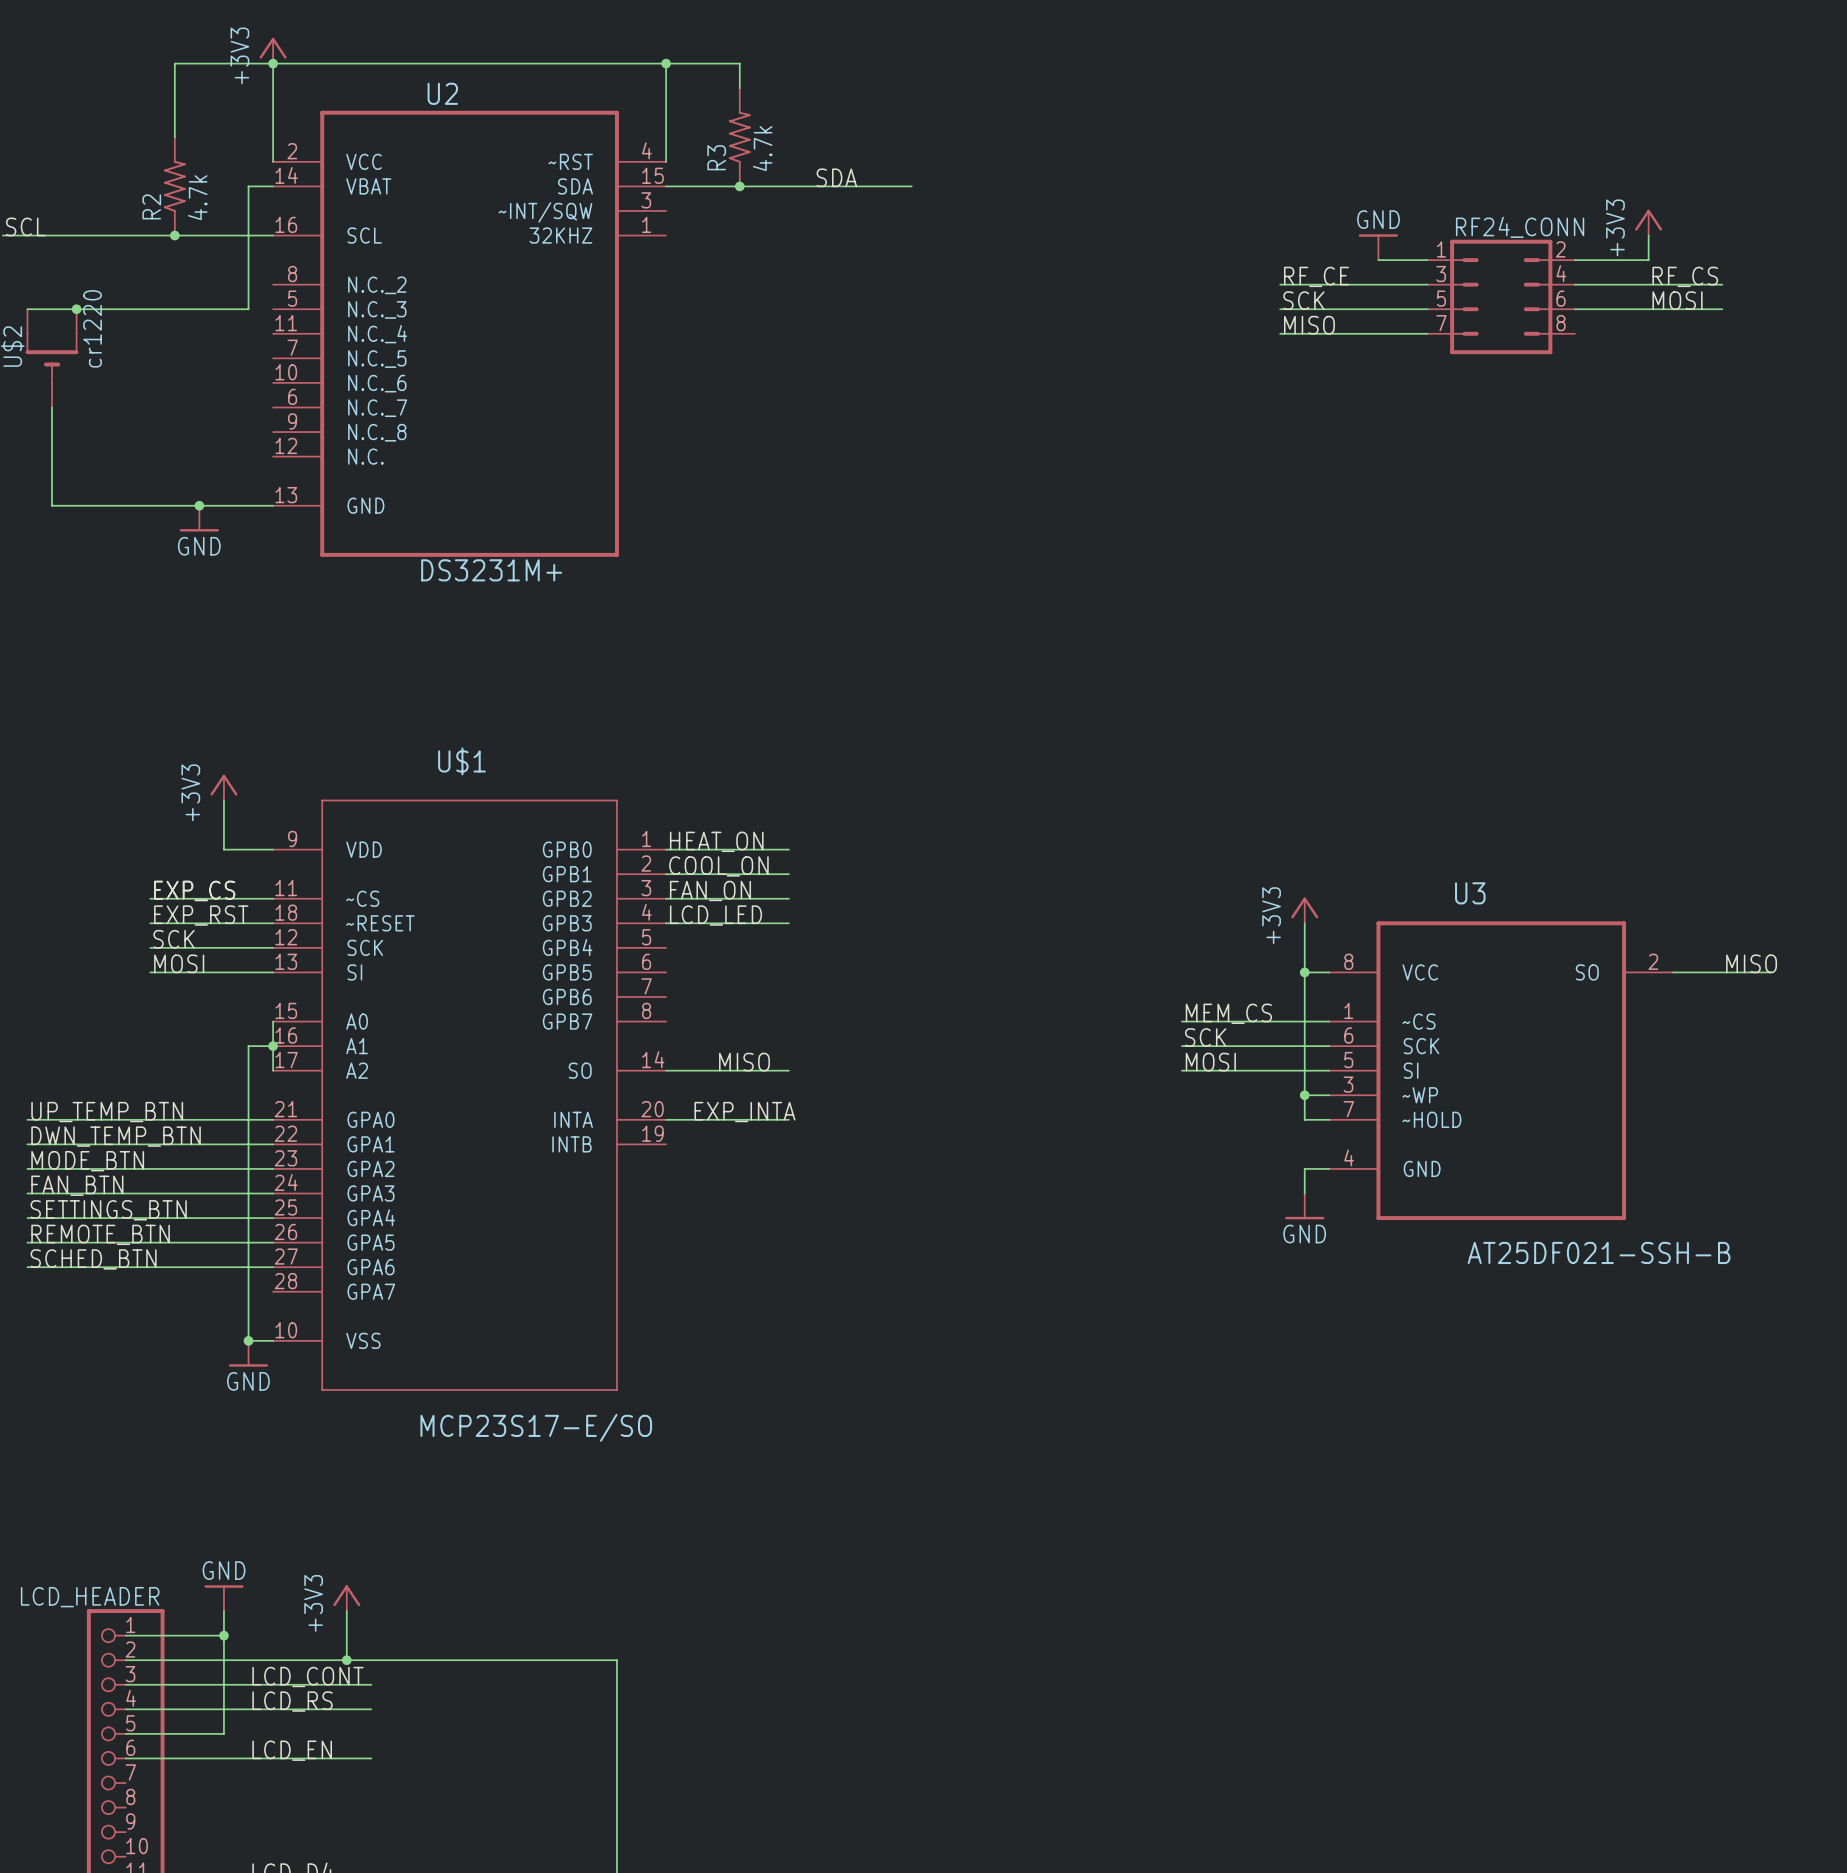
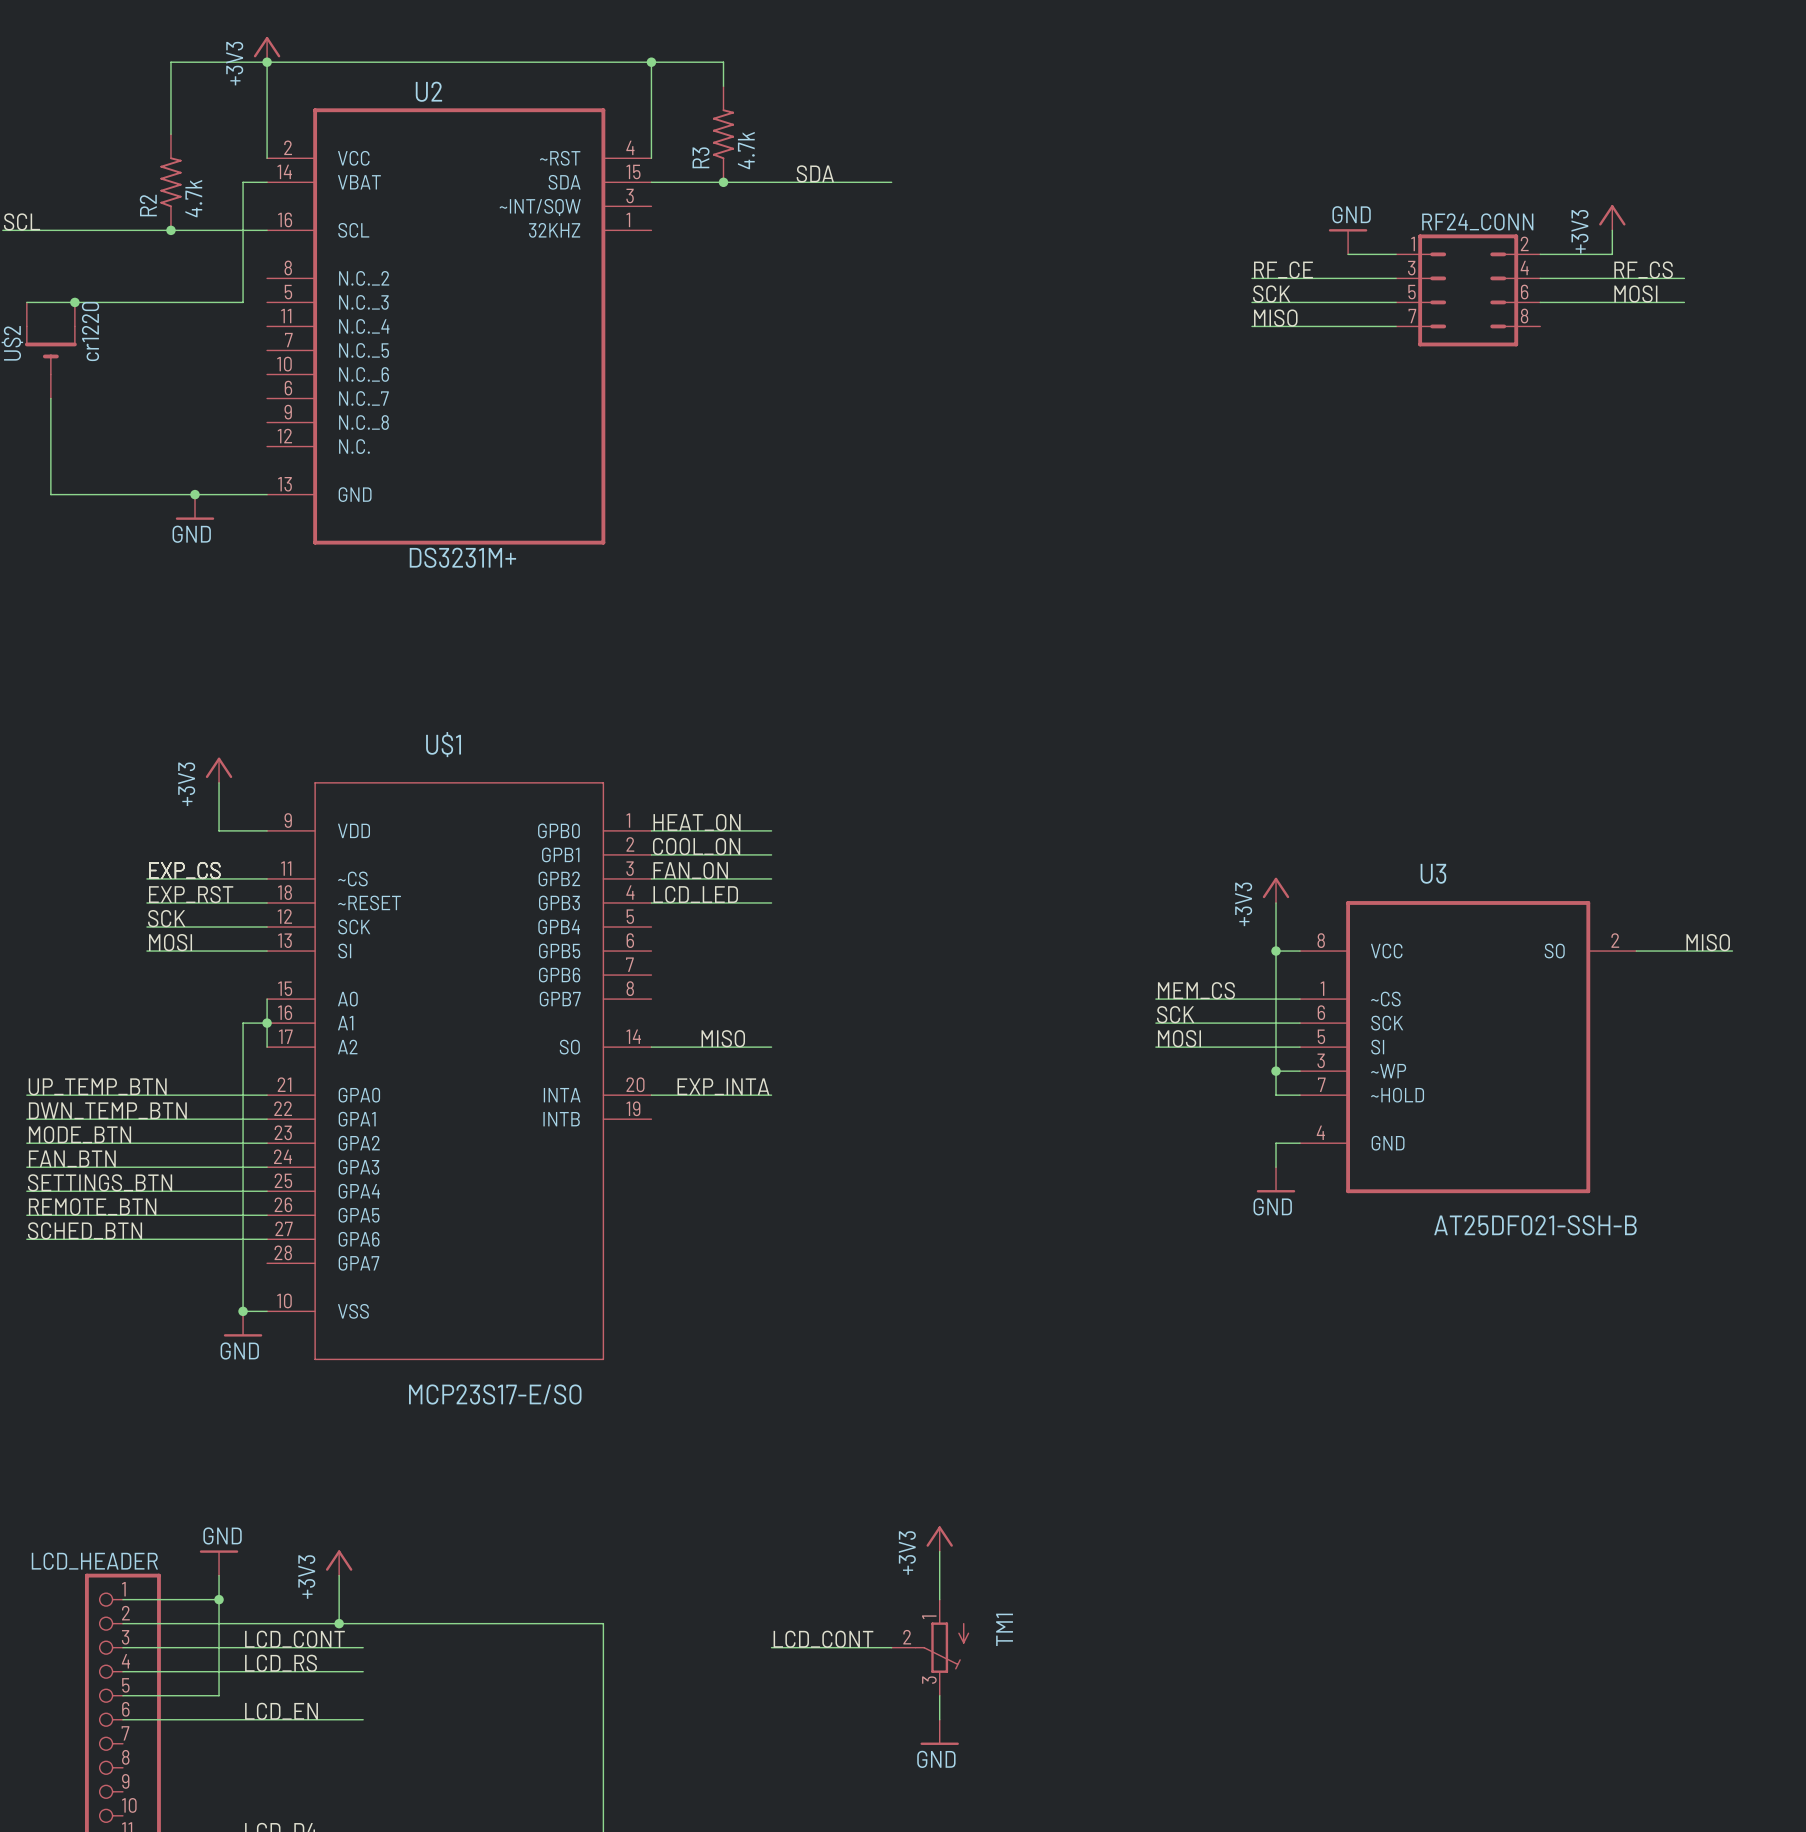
power symbol: none -> +3V3 (939, 1538)
wire: none -> (939, 1551) (939, 1599)
label: none -> LCD_CONT (823, 1639)
wire: none -> (771, 1647) (891, 1647)
TM1: none -> (930, 1647)
wire: none -> (939, 1695) (939, 1719)
power symbol: none -> GND (939, 1732)

